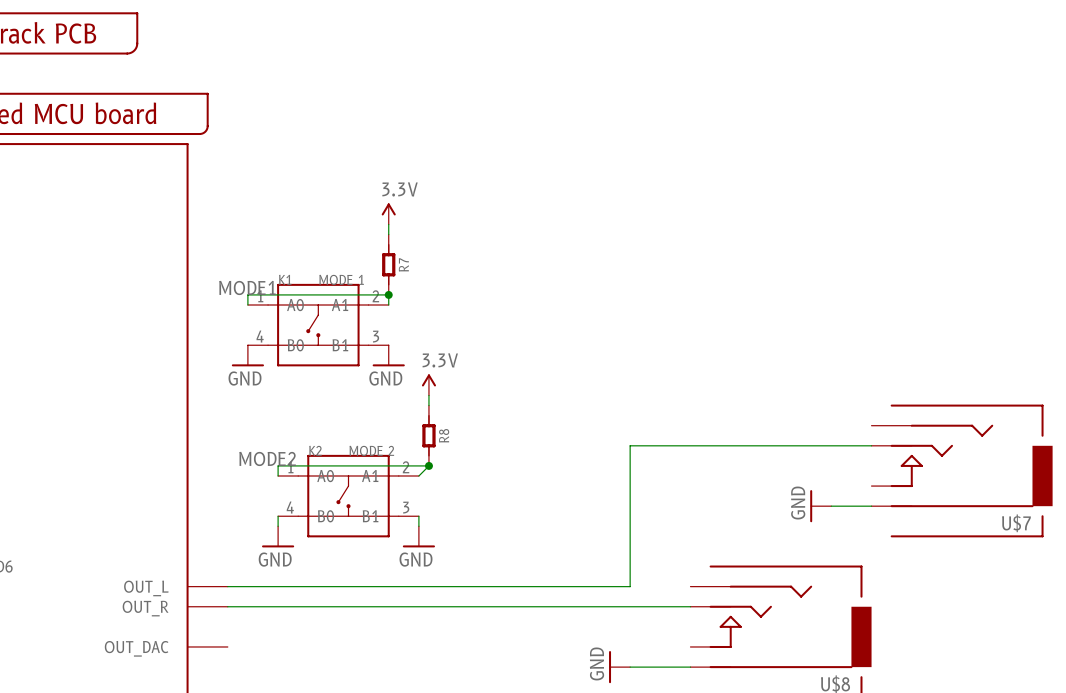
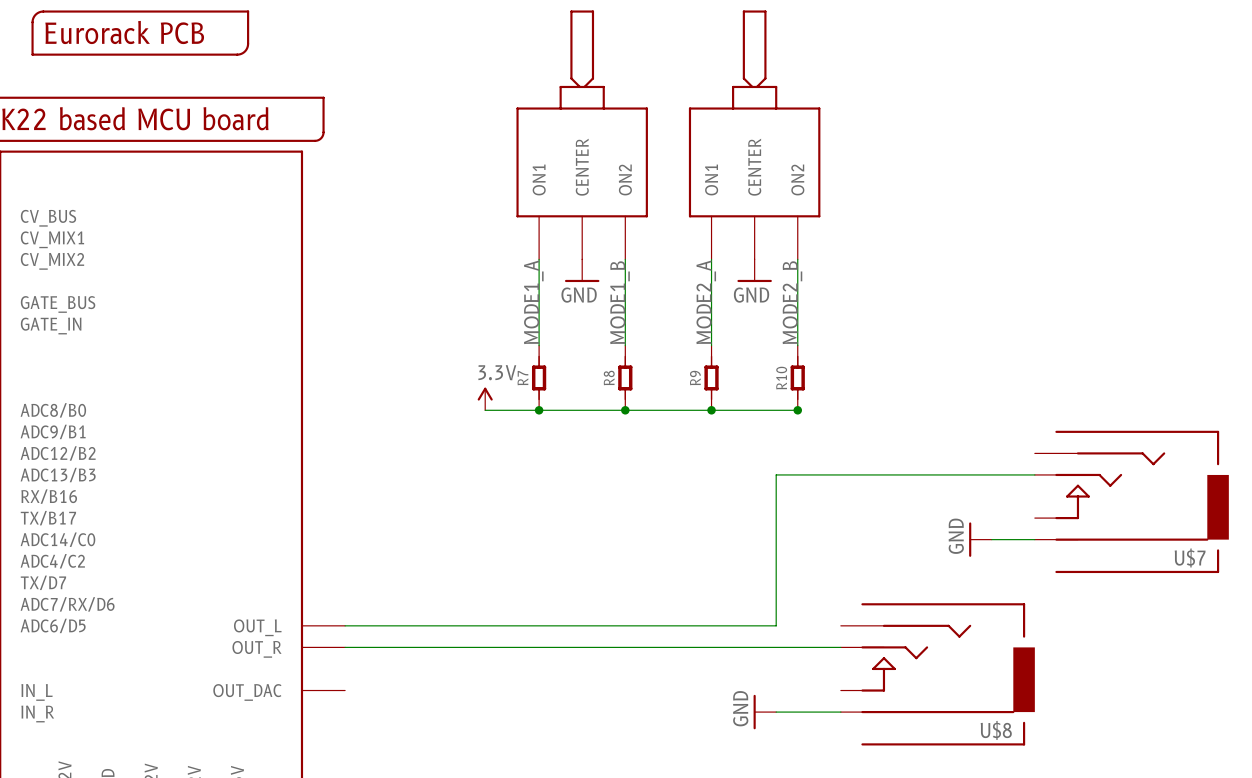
part: none -> (582, 134)
part: none -> (754, 134)
power symbol: 3.3V (388, 213) -> none
wire: (388, 224) (388, 234) -> none
wire: none -> (539, 259) (539, 345)
wire: none -> (625, 259) (625, 345)
wire: none -> (711, 259) (711, 345)
wire: none -> (797, 259) (797, 345)
power symbol: none -> GND (582, 270)
power symbol: none -> GND (754, 270)
R7 position: (388, 264) -> (539, 377)
R7 name position: R7 (403, 264) -> R7 (522, 378)
label: none -> MODE1_A (533, 302)
label: none -> MODE2_A (706, 302)
label: none -> MODE1_B (620, 302)
label: none -> MODE2_B (792, 302)
label: MODE1 (247, 287) -> none
junction: (388, 294) -> none
wire: (247, 305) (247, 294) (388, 294) (388, 305) -> none
K1: MODE 1 (318, 325) -> none
power symbol: GND (247, 355) -> none
power symbol: GND (388, 355) -> none
R9: none -> (711, 377)
R10: none -> (797, 377)
power symbol position: 3.3V (428, 384) -> 3.3V (485, 398)
wire: none -> (485, 410) (797, 410)
junction: none -> (539, 410)
junction: none -> (625, 410)
junction: none -> (711, 410)
junction: none -> (797, 410)
wire: (428, 395) (428, 405) -> none
R8 position: (428, 435) -> (625, 377)
R8 name position: R8 (444, 435) -> R8 (609, 378)
label: MODE2 (267, 458) -> none
junction: (428, 465) -> none
wire: (278, 475) (278, 465) (428, 465) (418, 475) -> none
K2: MODE 2 (348, 496) -> none
wire: (278, 516) (278, 526) -> none
wire: (418, 516) (418, 526) -> none
power symbol: GND (278, 536) -> none
power symbol: GND (418, 536) -> none

